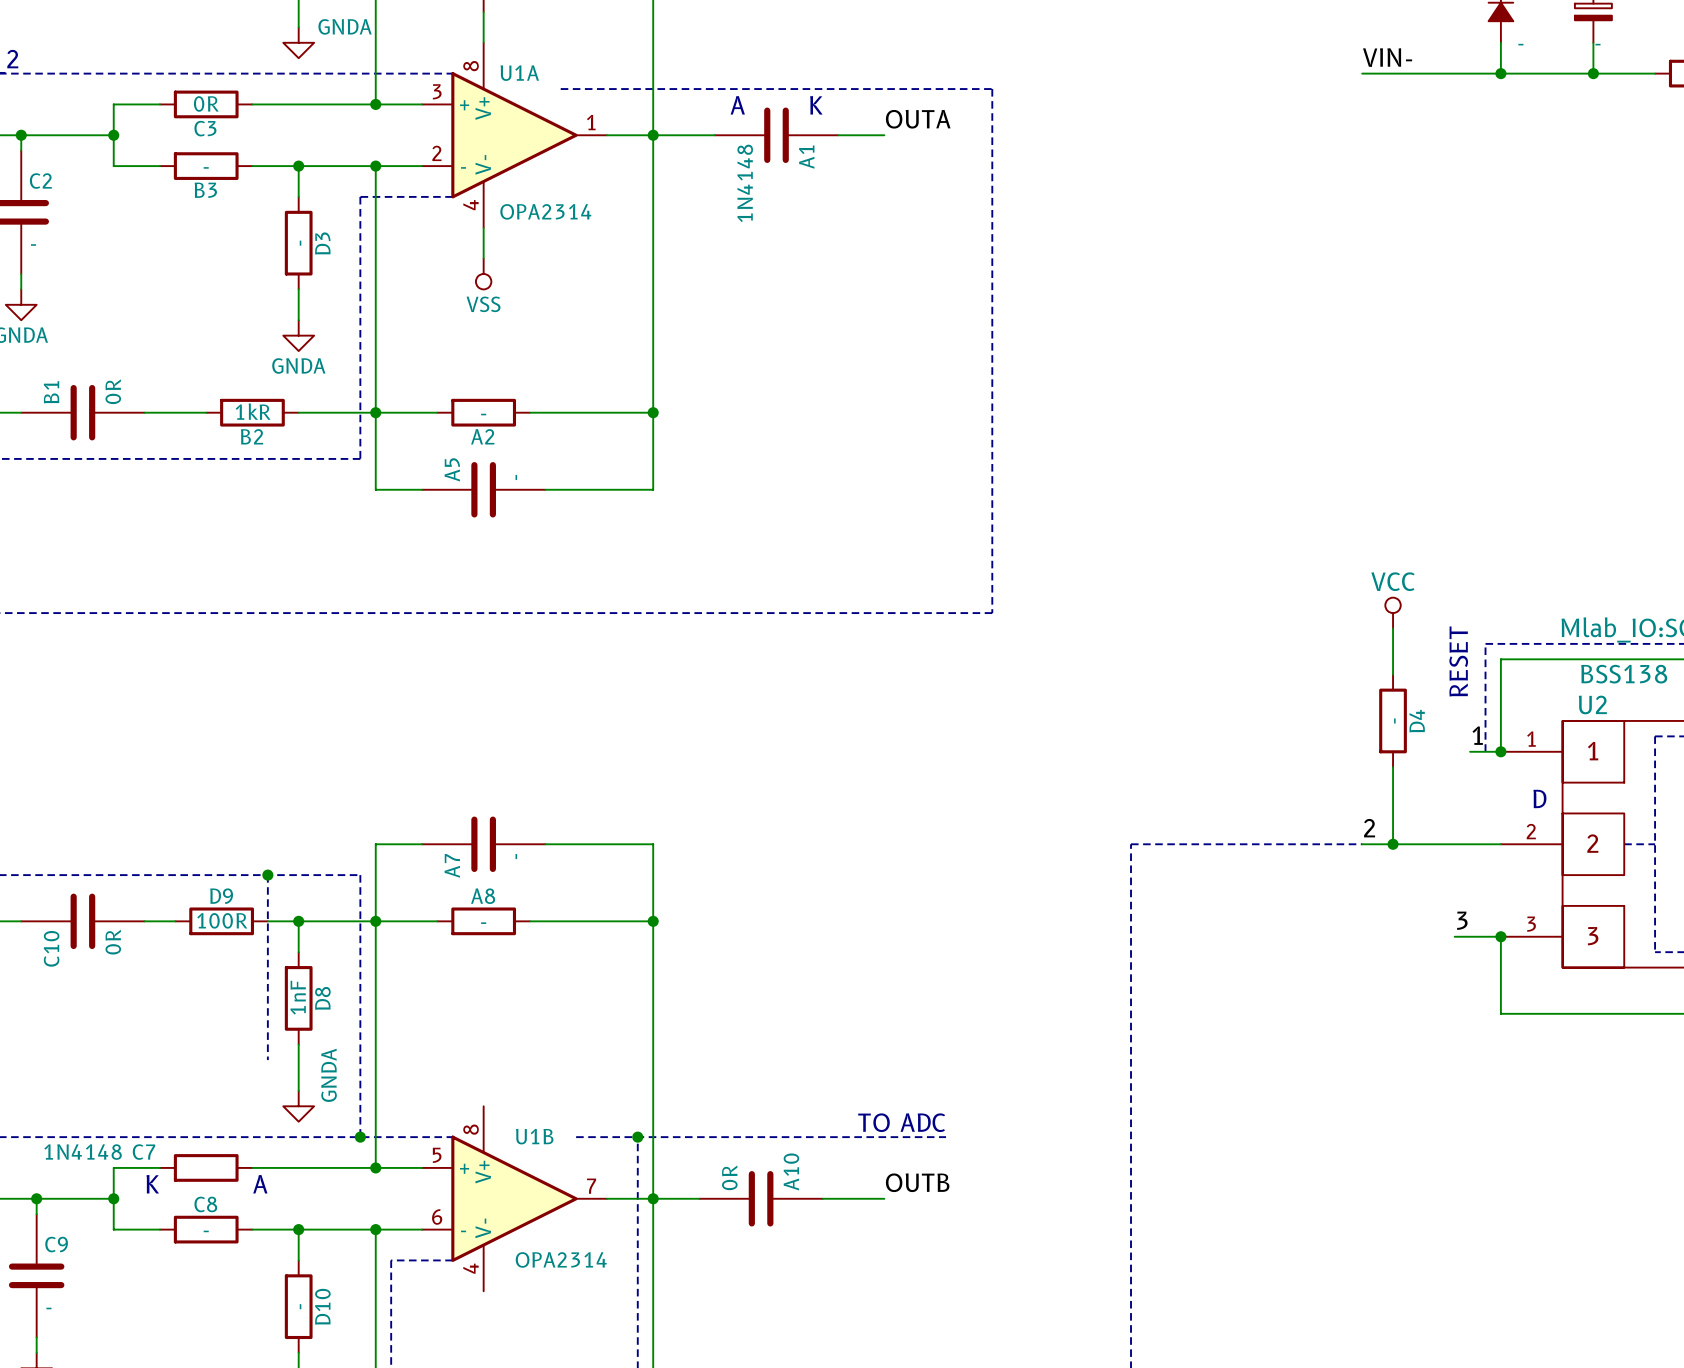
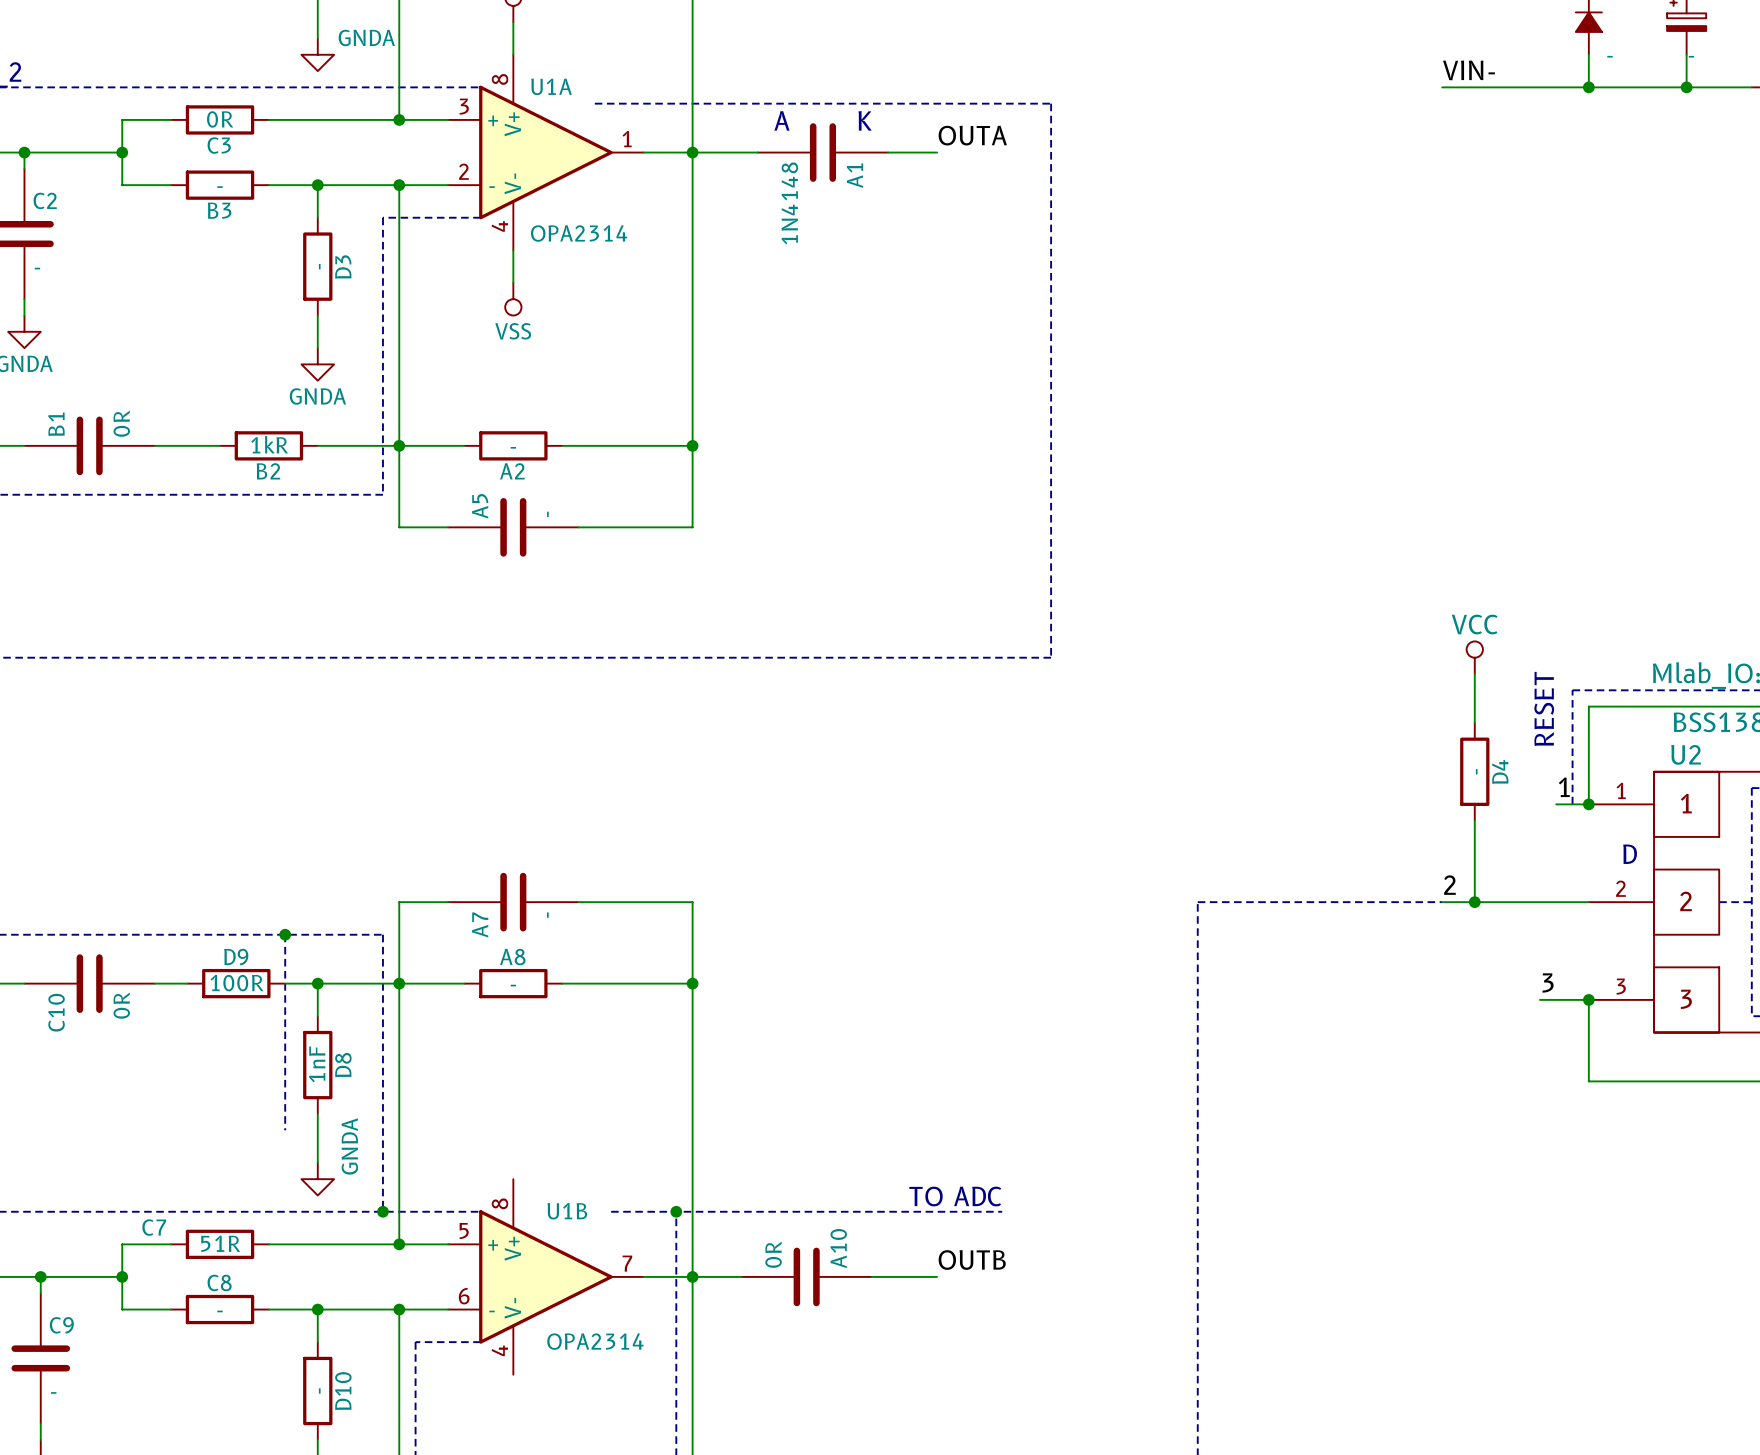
C7 value: 1N4148 (83, 1152) -> 51R (220, 1243)
text: K (152, 1184) -> none
text: A (260, 1184) -> none

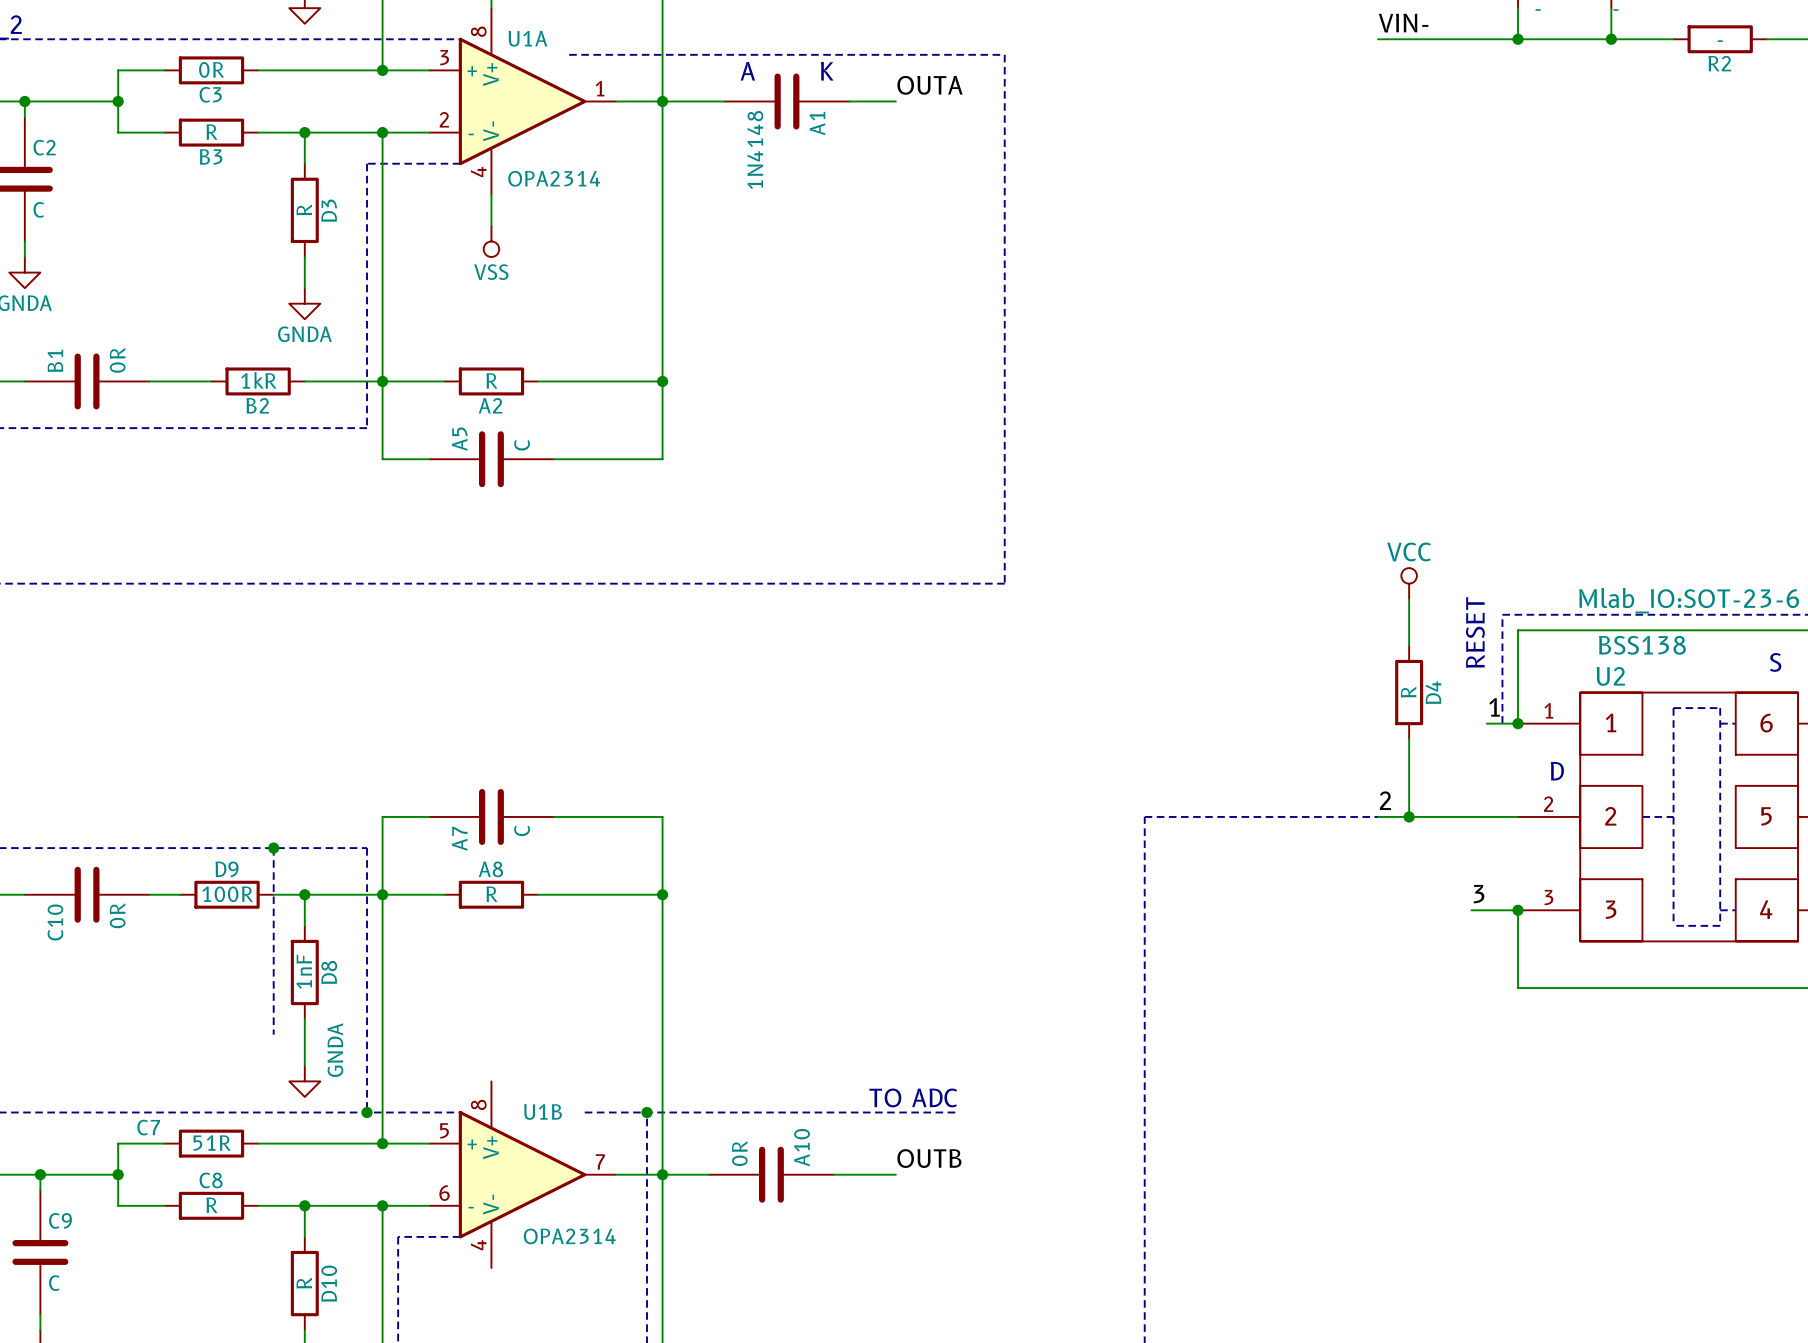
B3 value: - (220, 187) -> R (211, 132)
D3 value: - (319, 266) -> R (304, 209)
C2 value: - (37, 268) -> C (38, 209)
A2 value: - (513, 447) -> R (491, 380)
A5 value: - (547, 514) -> C (522, 445)
D4 value: - (1476, 771) -> R (1408, 692)
A7 value: - (547, 915) -> C (522, 830)
A8 value: - (513, 985) -> R (491, 894)
C8 value: - (220, 1311) -> R (211, 1205)
D10 value: - (319, 1391) -> R (304, 1283)
C9 value: - (53, 1392) -> C (54, 1283)

